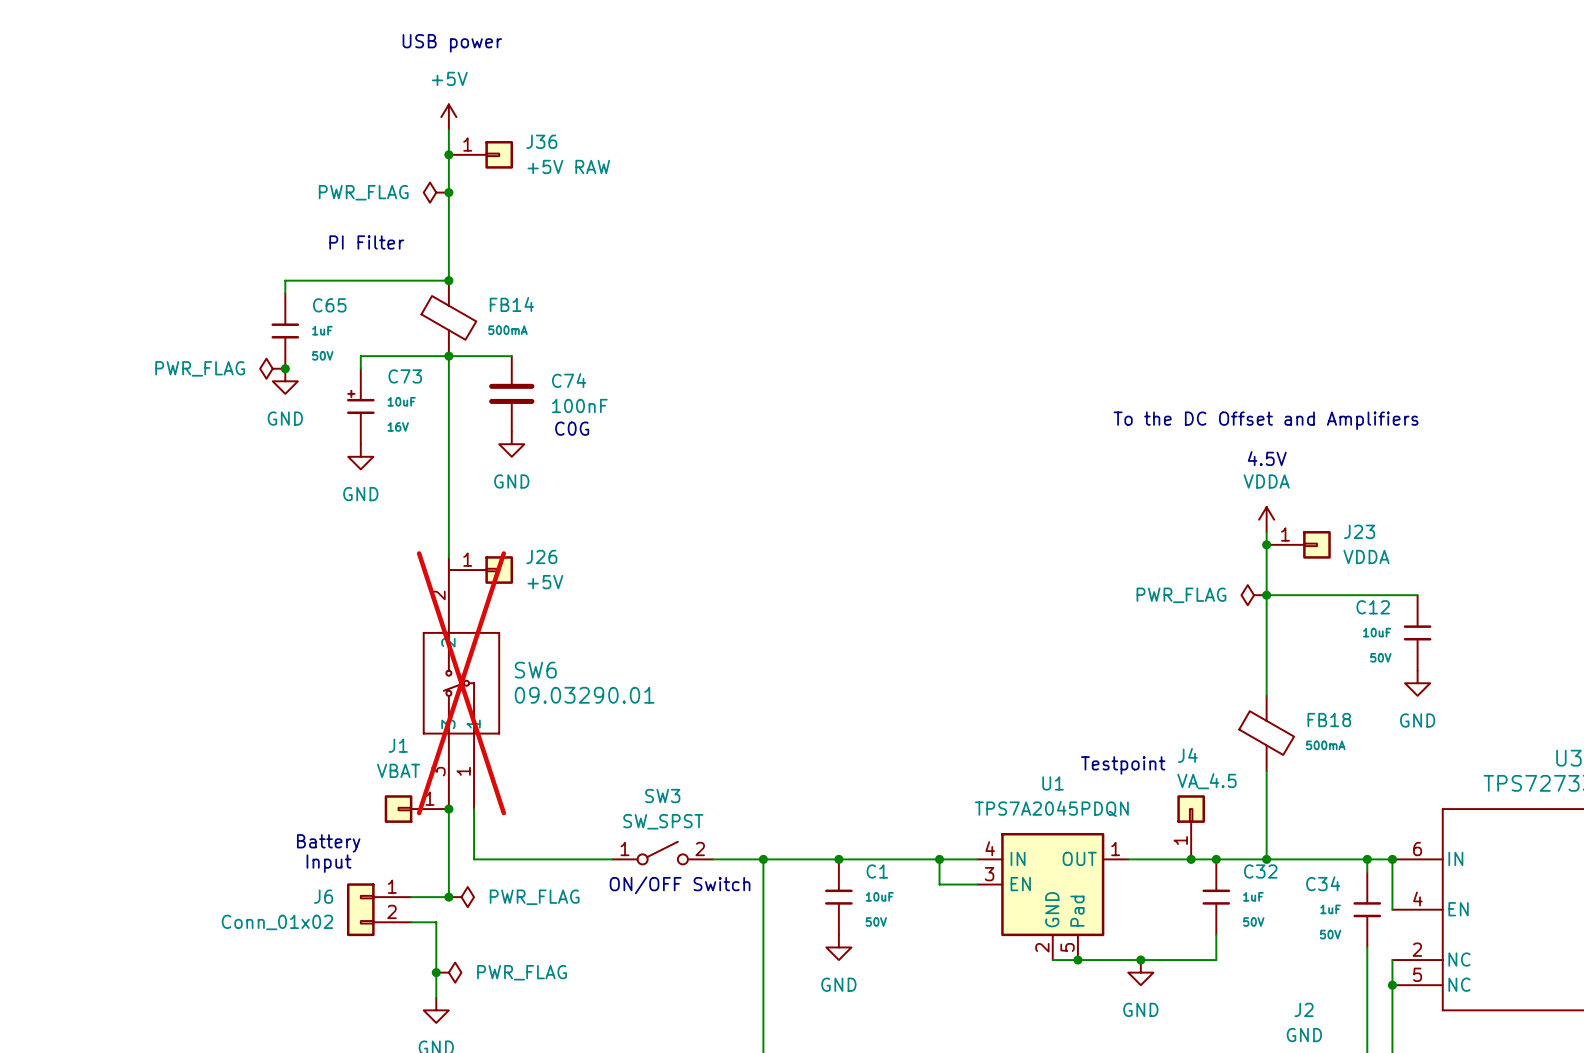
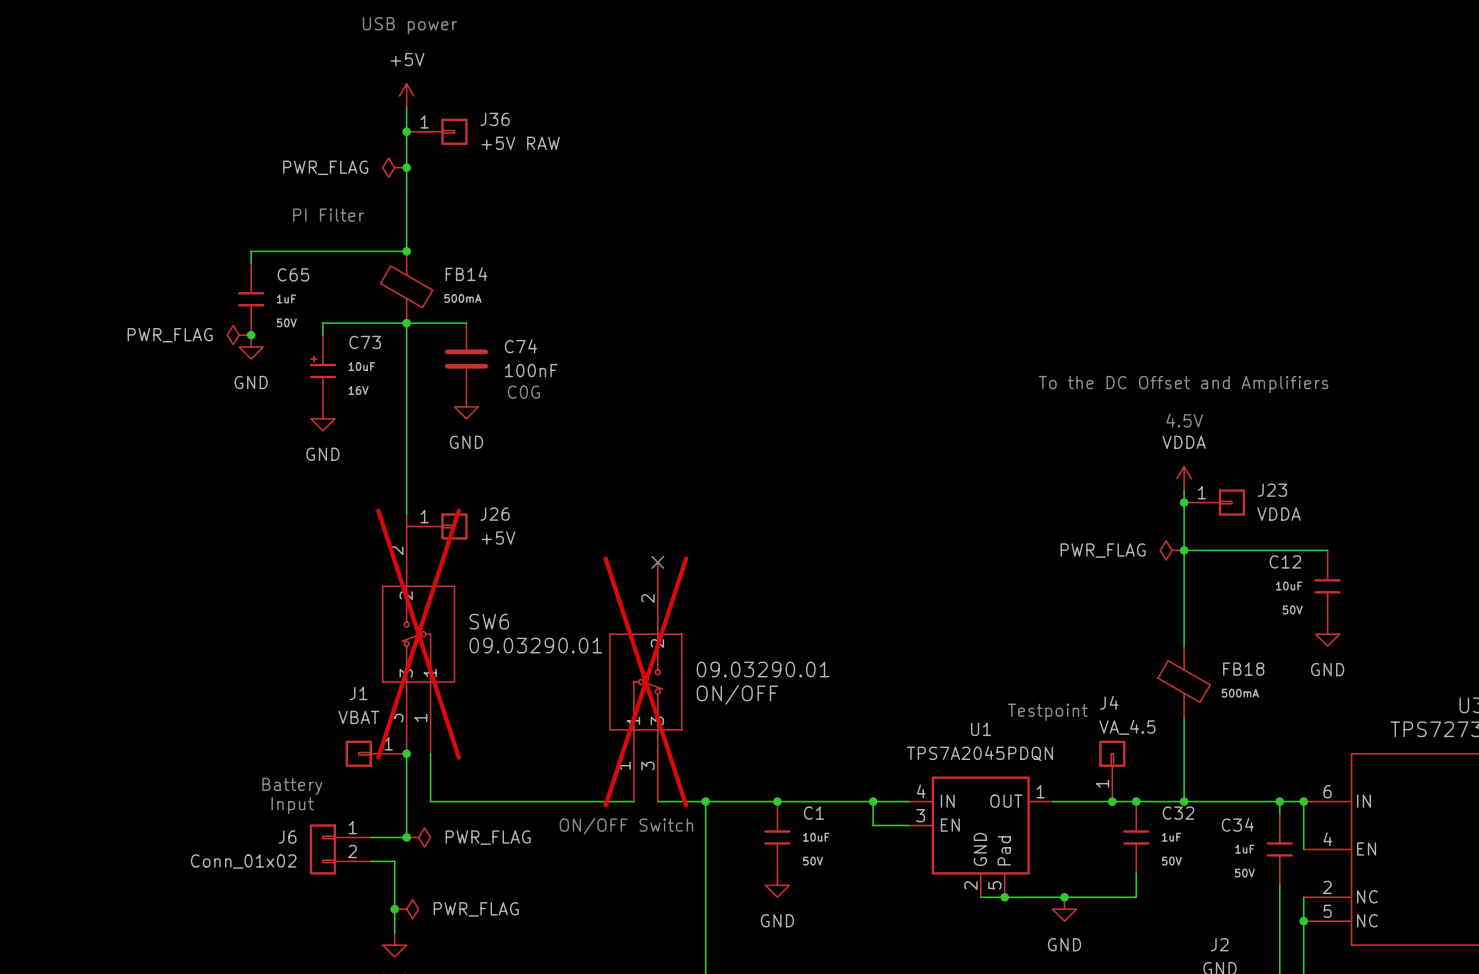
no-connect mark: none -> (657, 562)
ON/OFF: none -> 09.03290.01 (645, 681)
SW3: SW_SPST (662, 853) -> none
wire: none -> (562, 801) (633, 801)

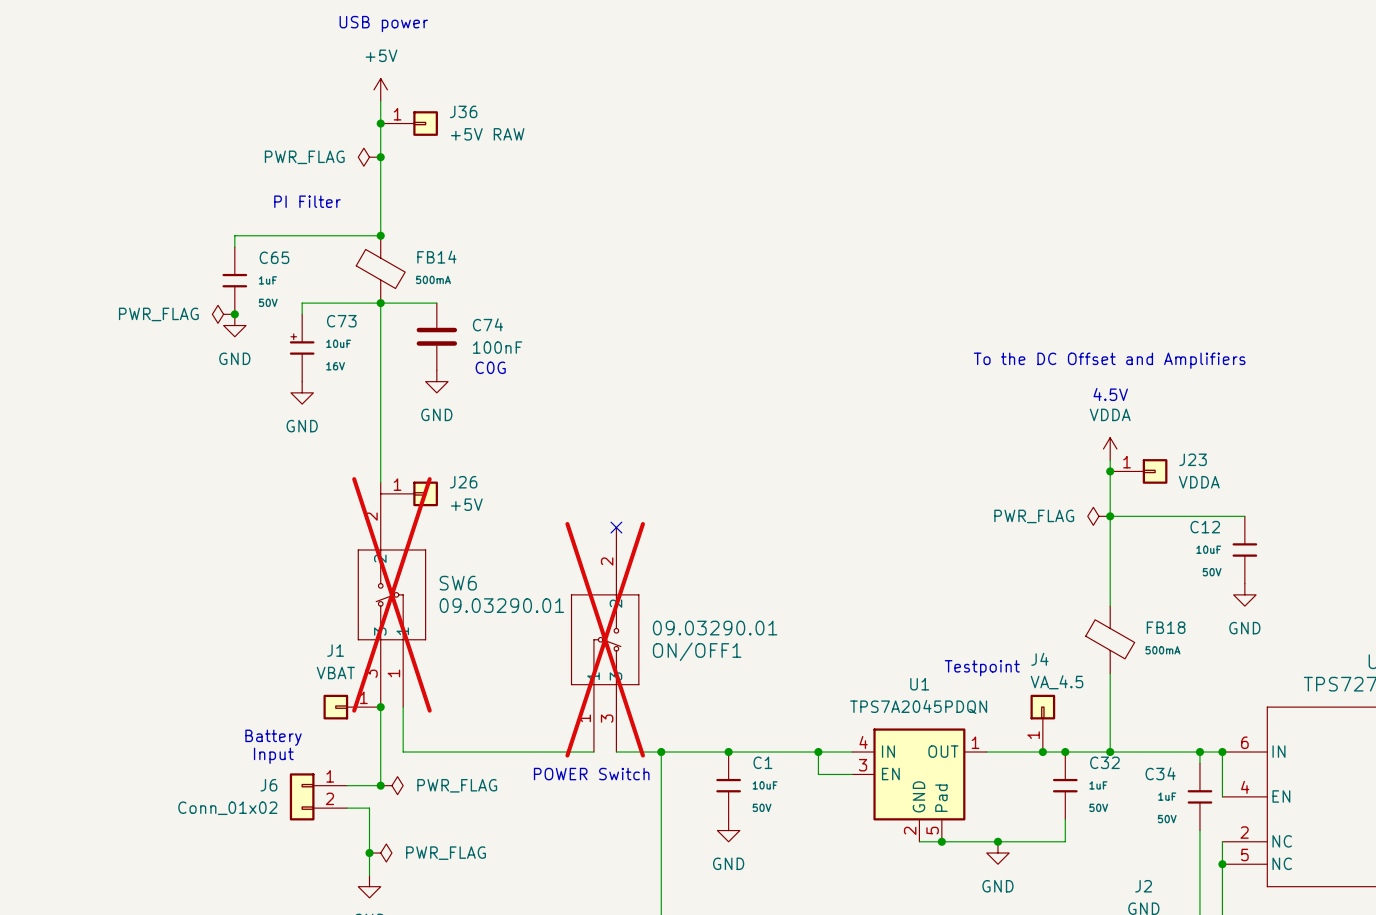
ON/OFF name: ON/OFF (737, 694) -> ON/OFF1 (697, 651)
text: ON/OFF Switch (626, 826) -> POWER Switch (591, 774)

